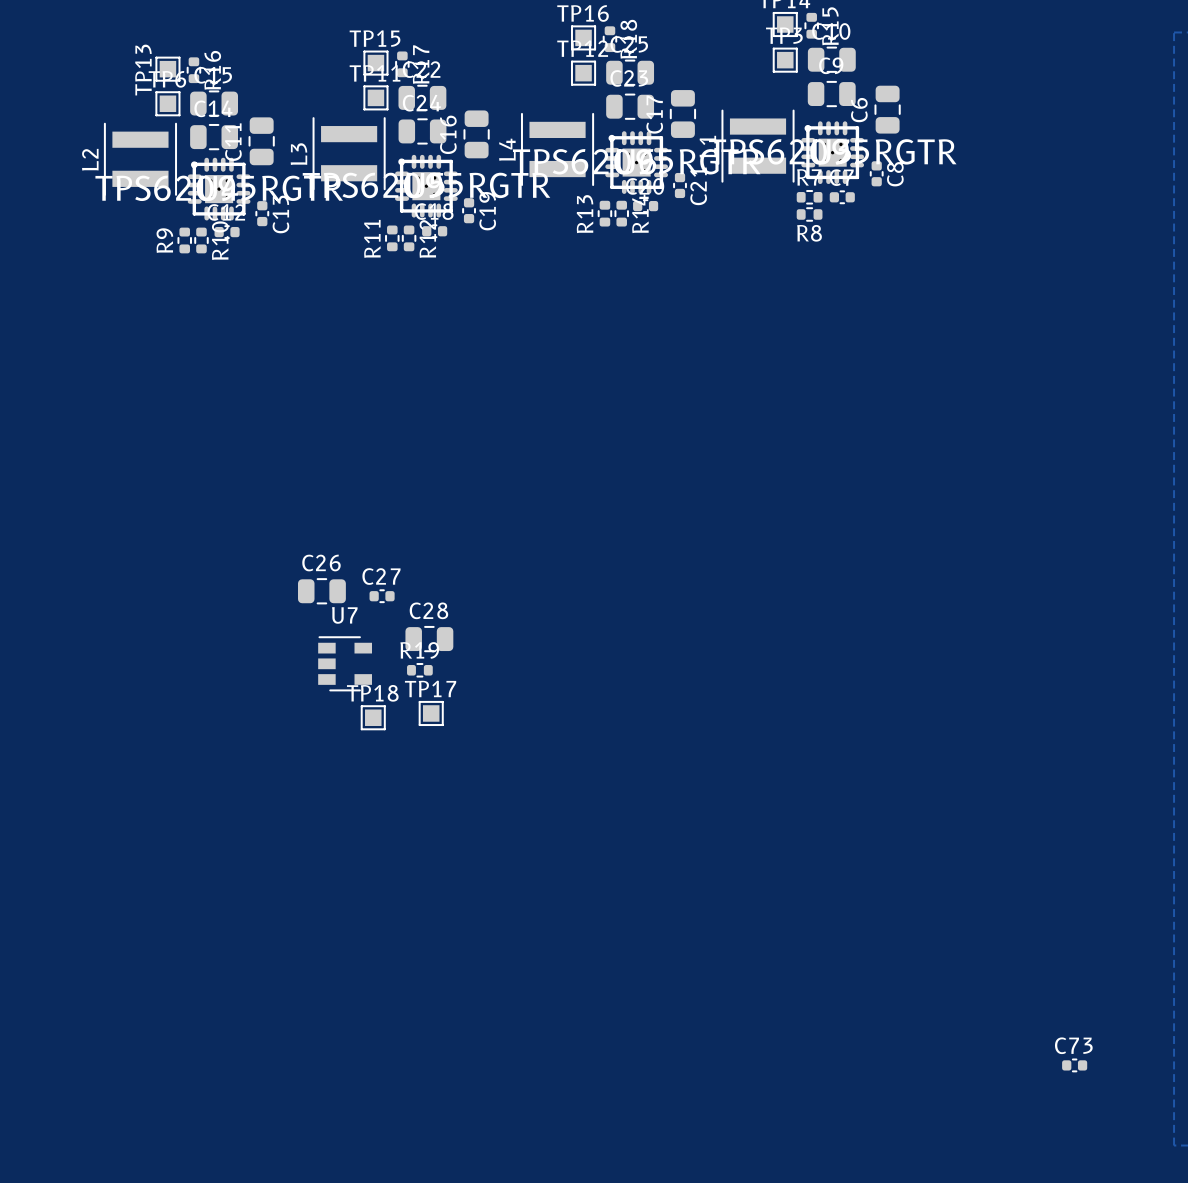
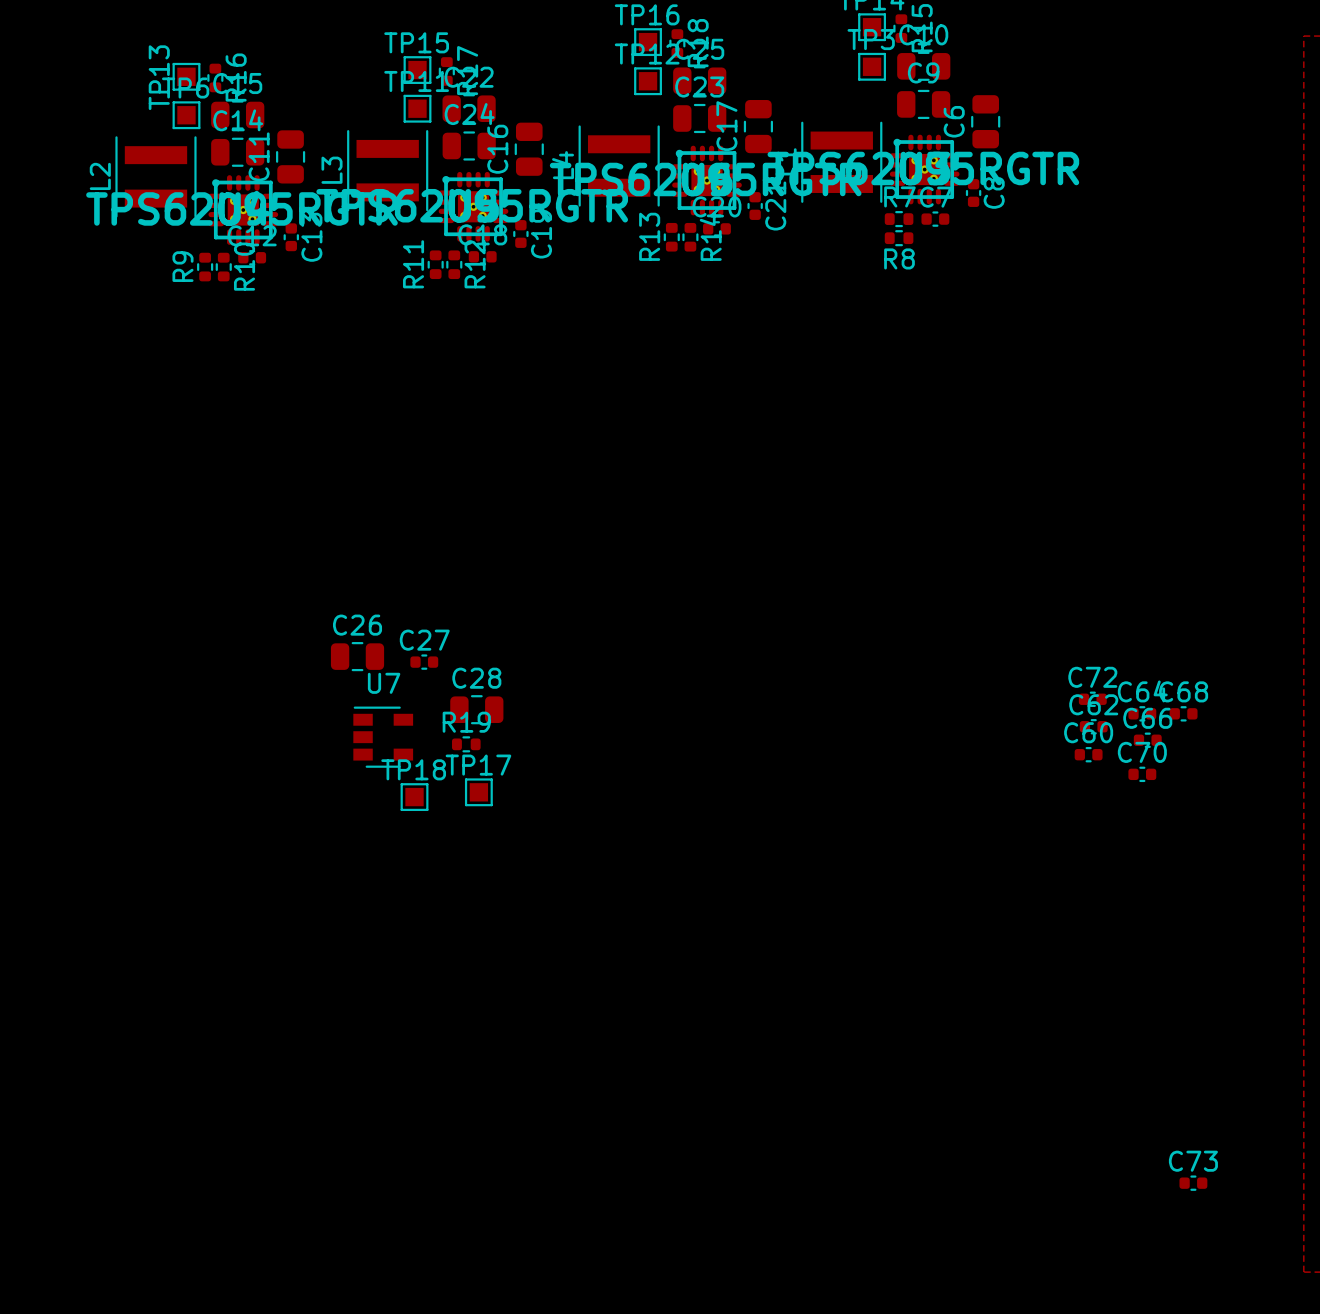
C72: none -> (1092, 699)
C64: none -> (1142, 713)
C68: none -> (1183, 713)
C62: none -> (1093, 726)
C66: none -> (1147, 740)
C60: none -> (1088, 754)
C70: none -> (1142, 774)

